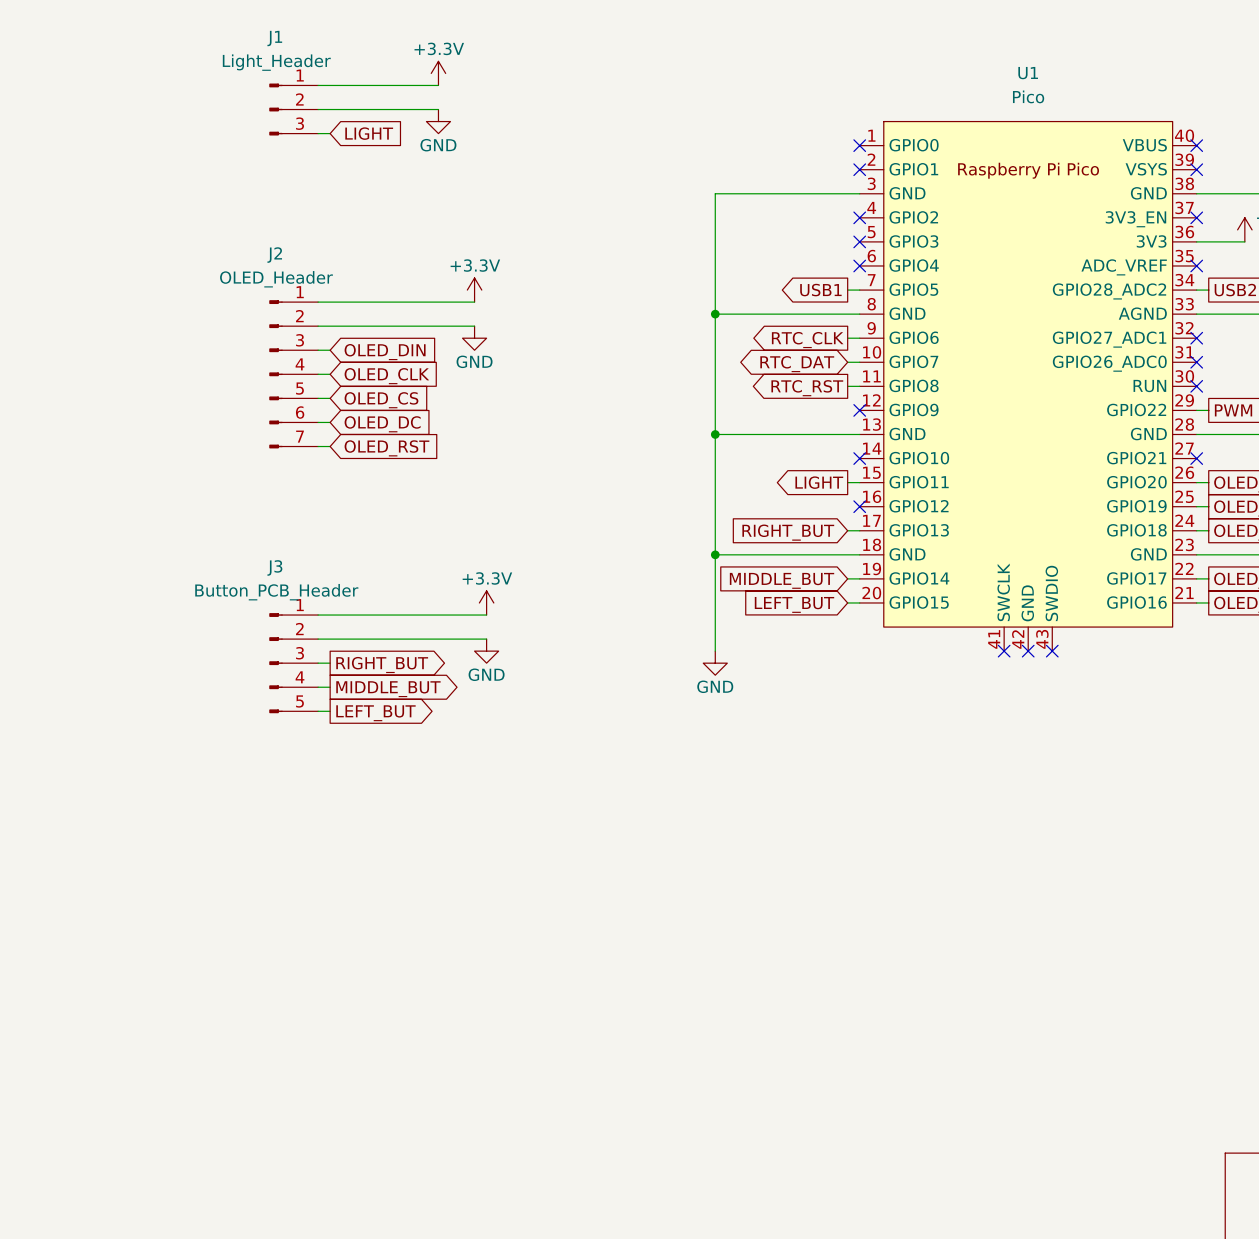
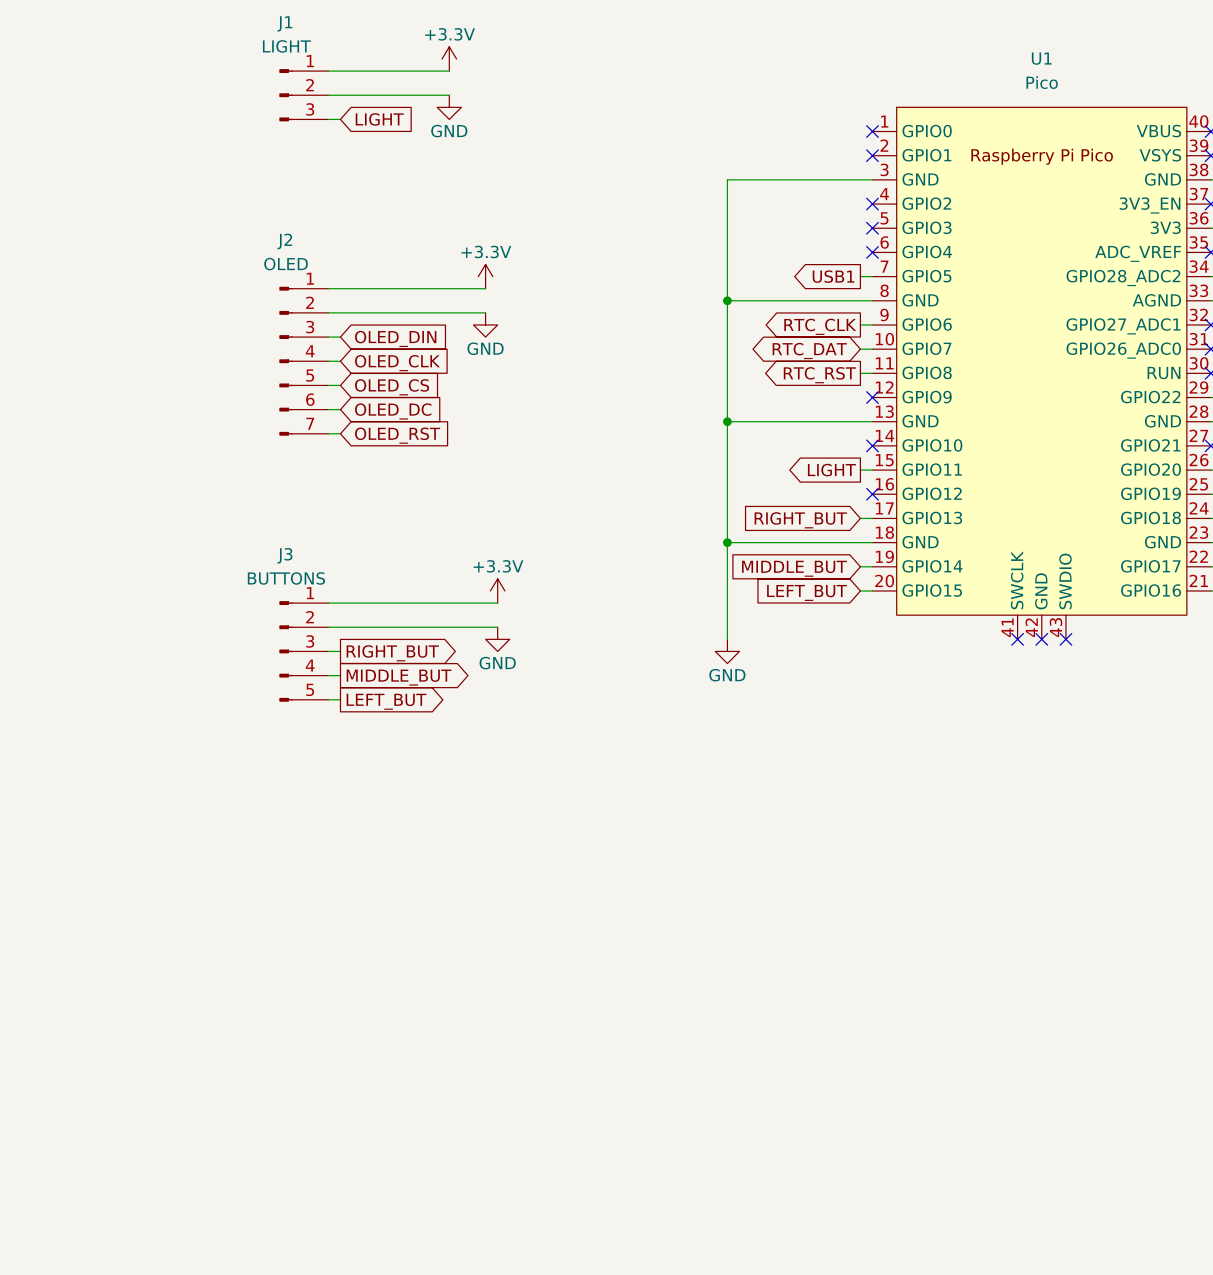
J1 value: Light_Header (276, 62) -> LIGHT (286, 46)
J2 value: OLED_Header (276, 279) -> OLED (286, 264)
J3 value: Button_PCB_Header (276, 592) -> BUTTONS (286, 578)

